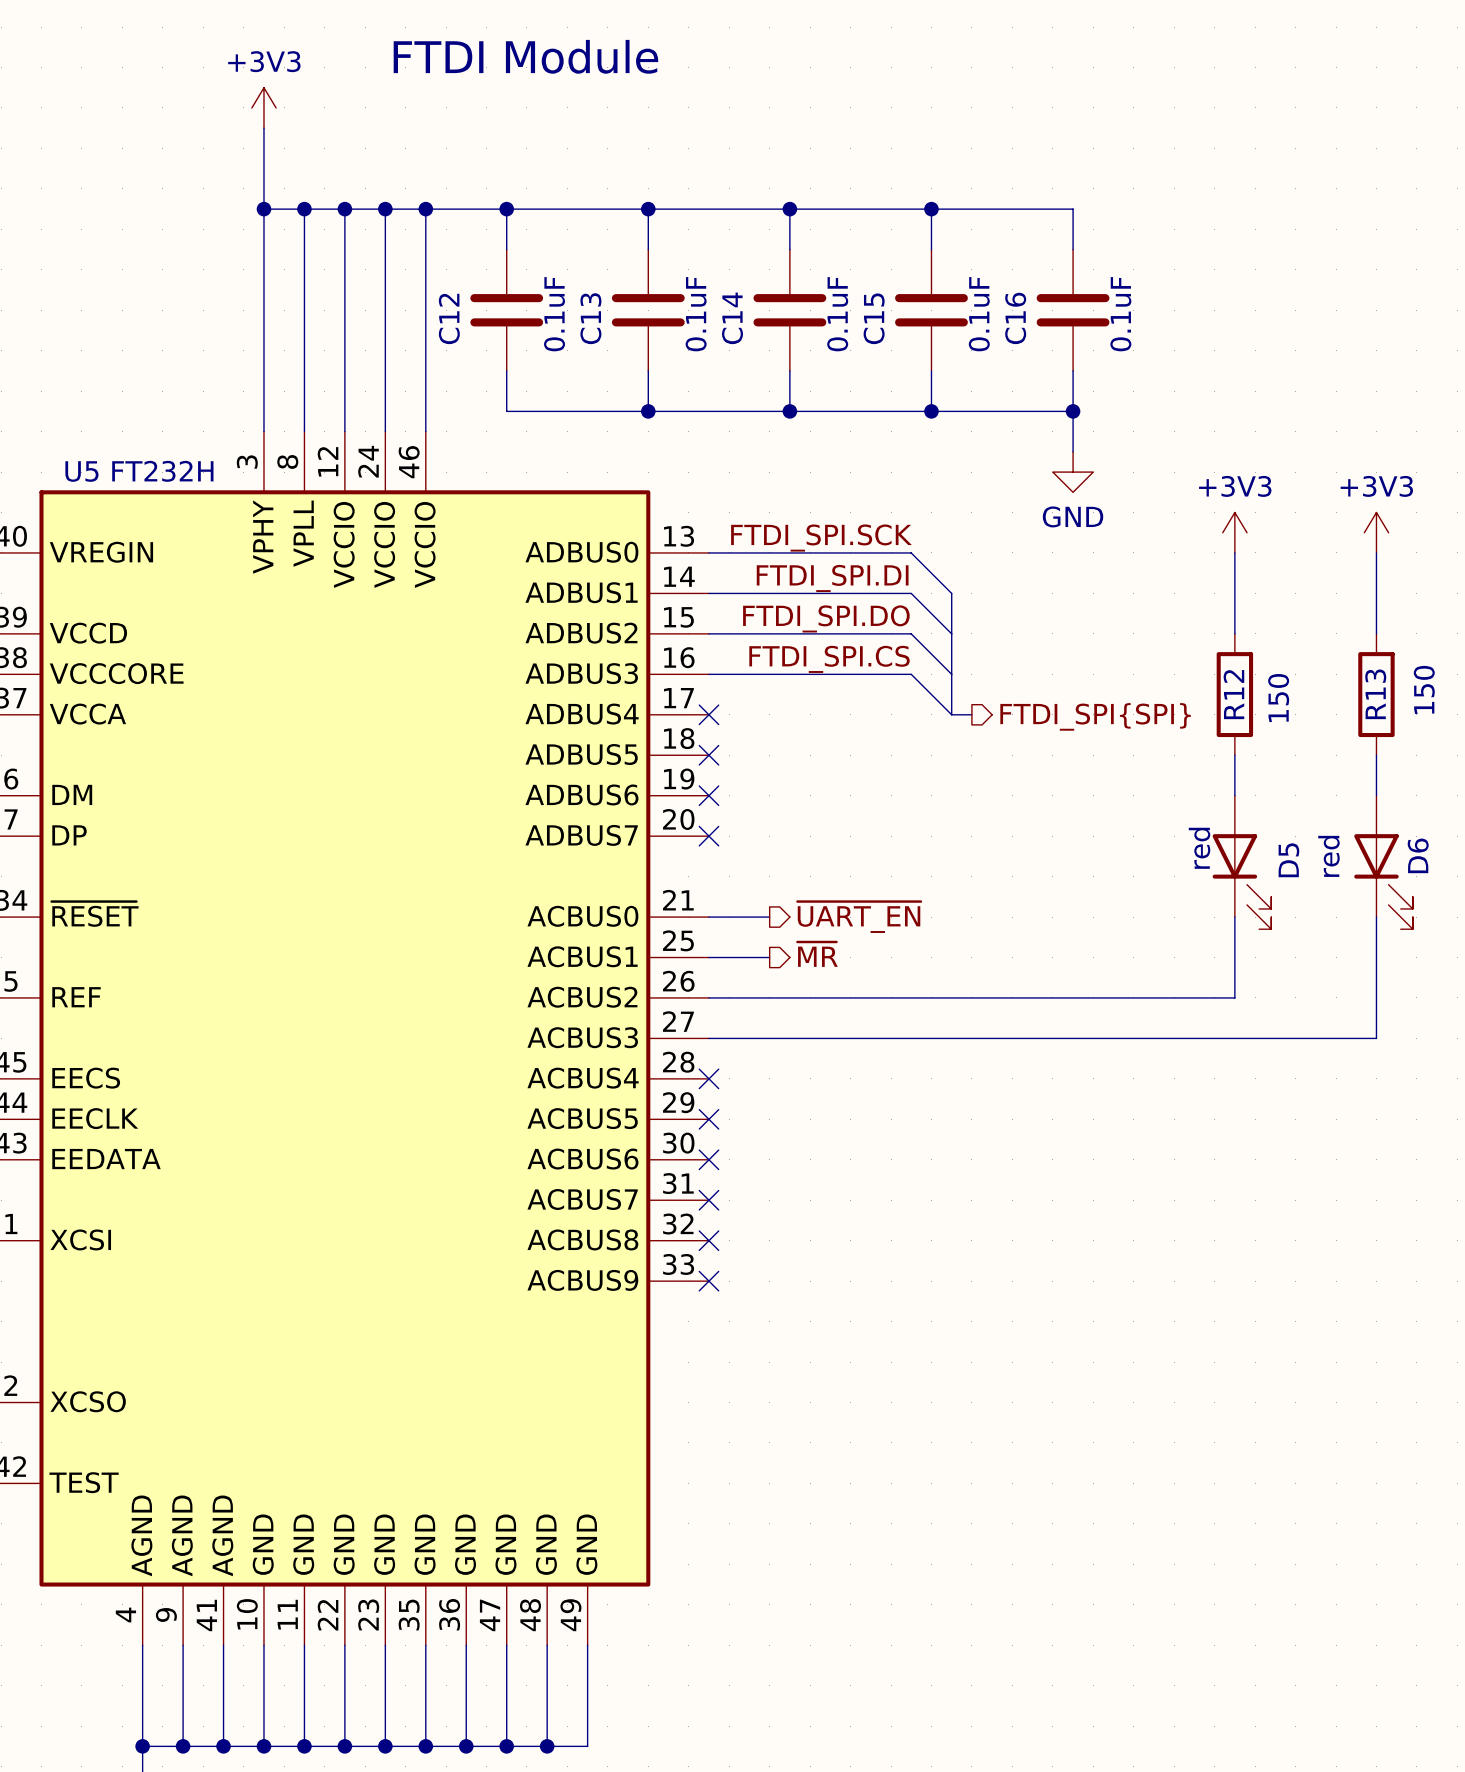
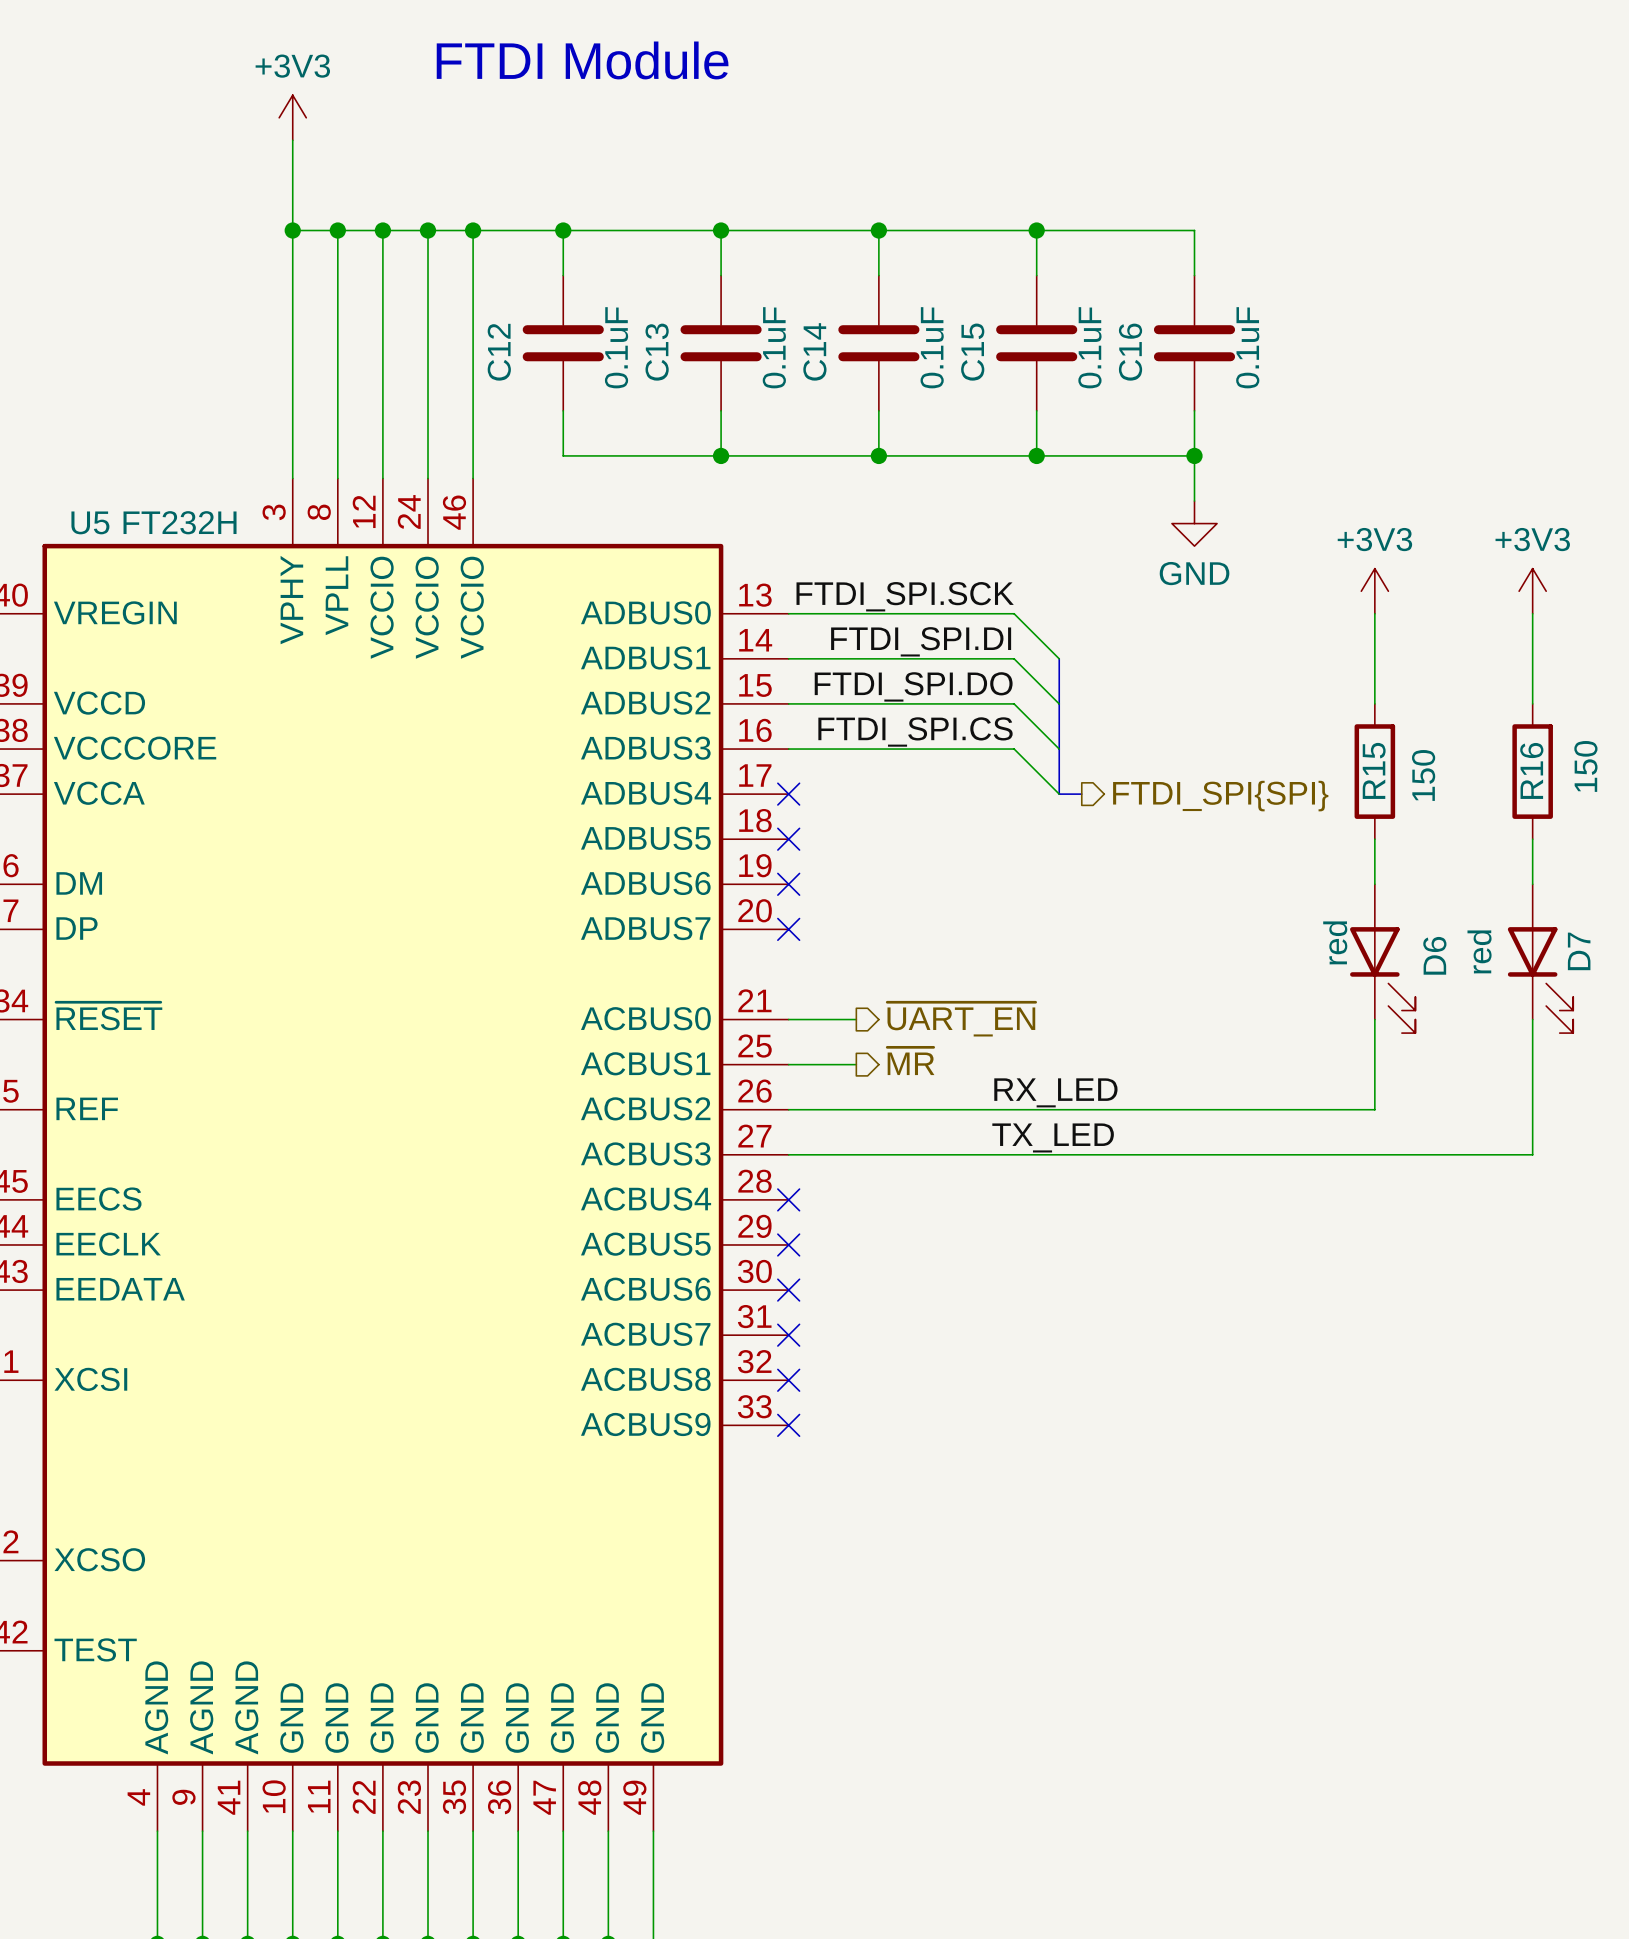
R12 name: R12 (1233, 694) -> R15 (1374, 770)
R13 name: R13 (1375, 694) -> R16 (1531, 770)
D6 name: D6 (1418, 855) -> D7 (1579, 951)
D5 name: D5 (1288, 860) -> D6 (1434, 955)
label: none -> RX_LED (1055, 1092)
label: none -> TX_LED (1053, 1137)

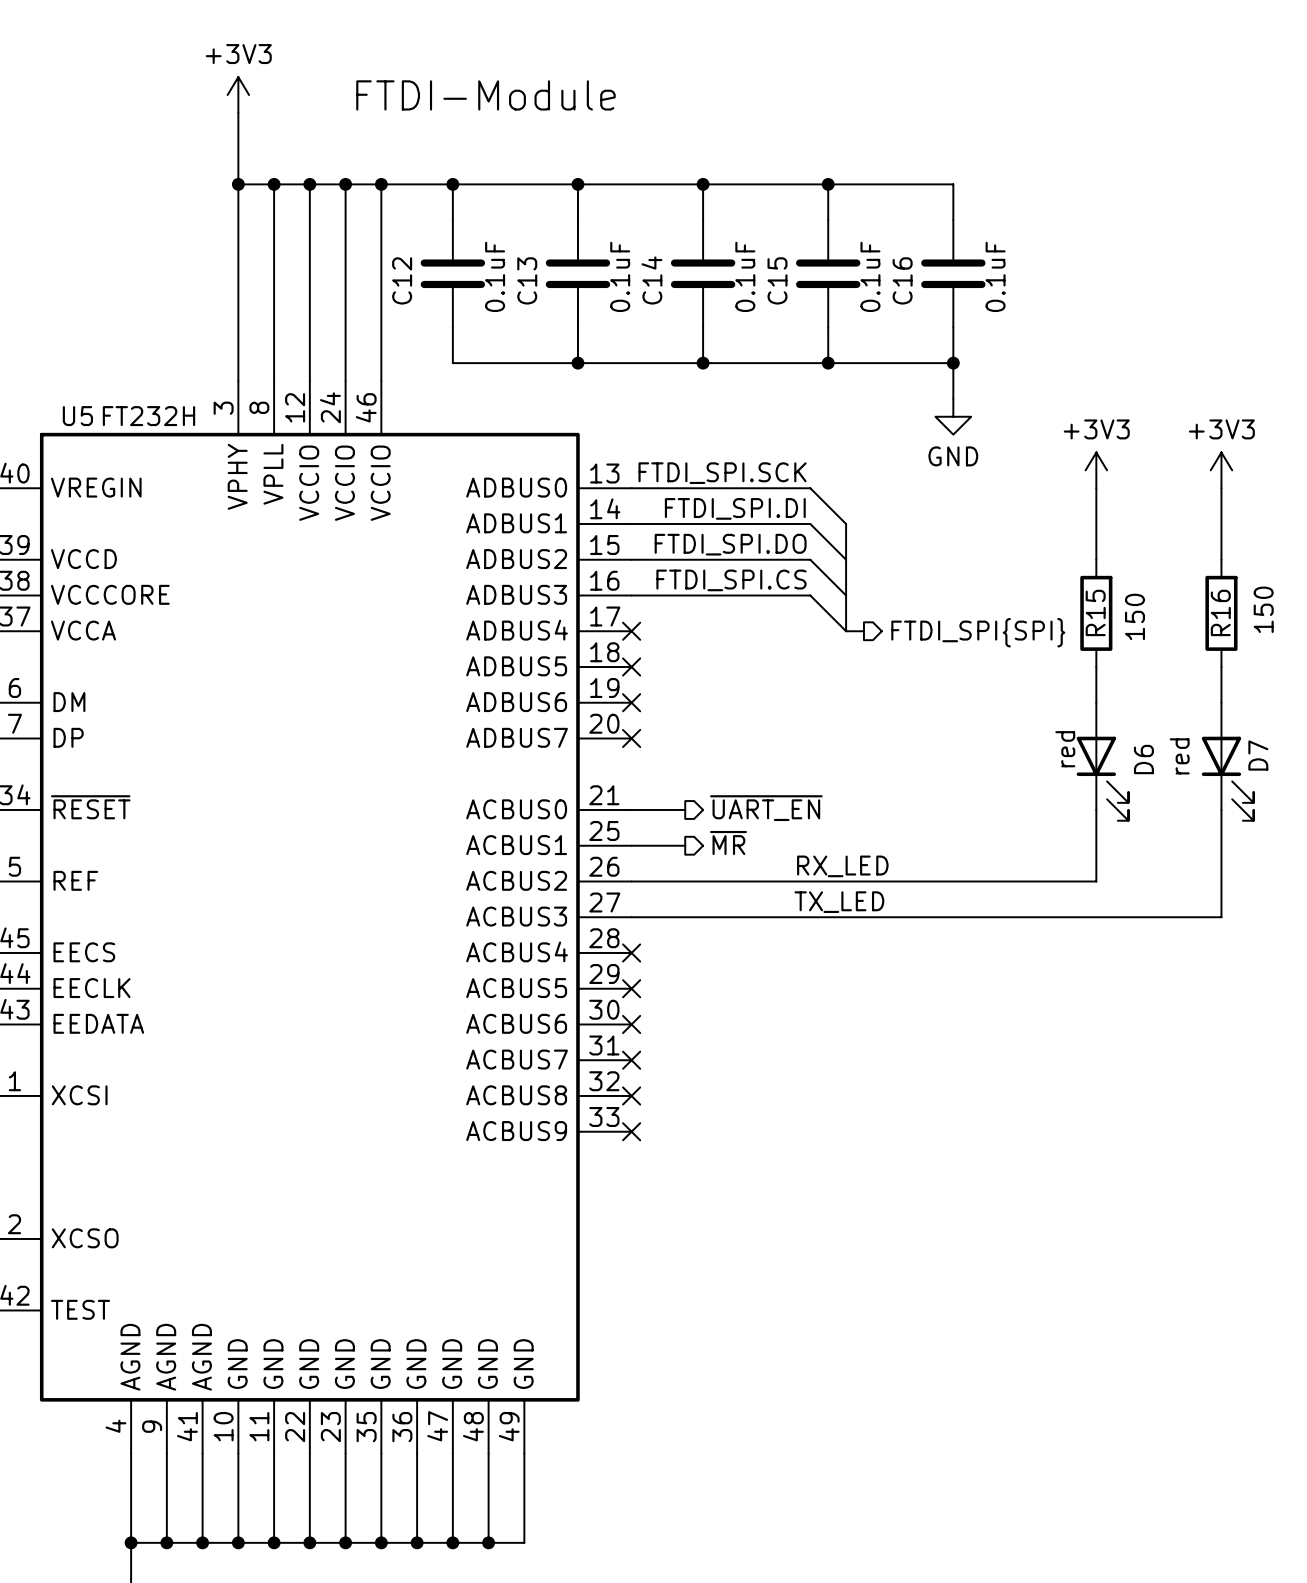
text: FTDI Module (582, 60) -> FTDI-Module (485, 95)

